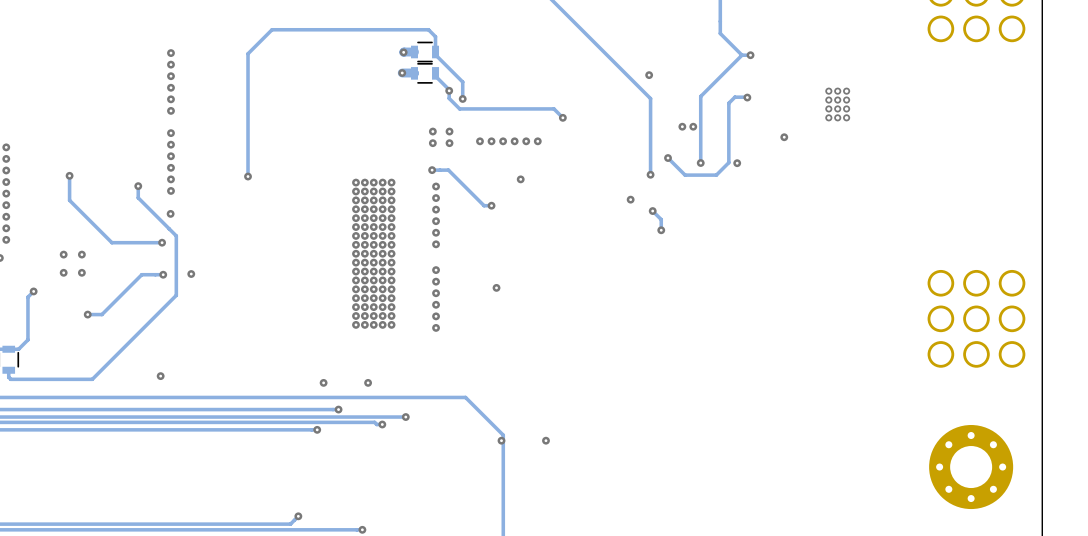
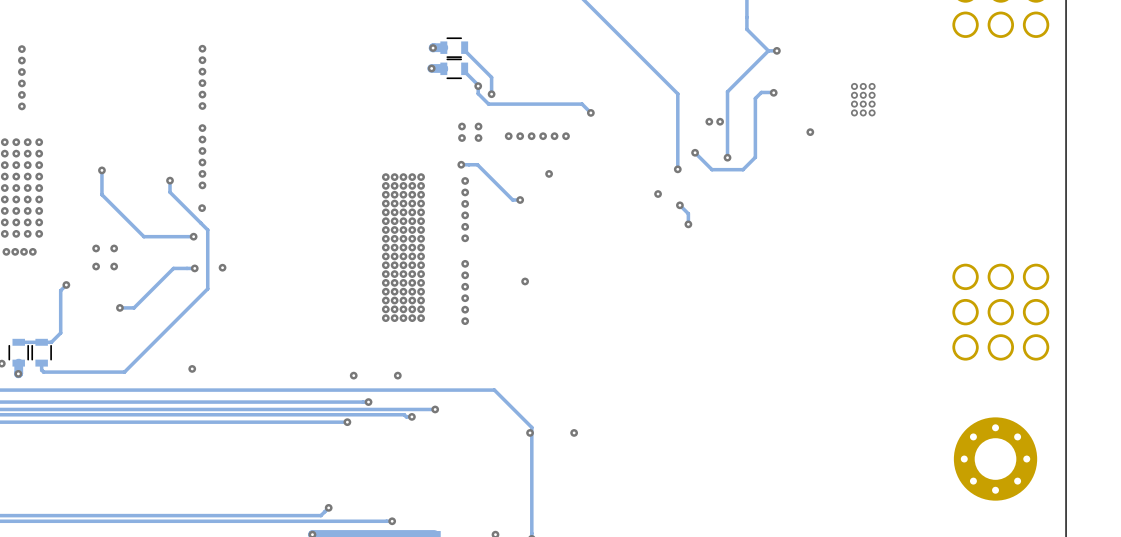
track: (435, 52) (435, 36) (428, 29) (272, 29) (248, 53) (248, 176) -> none
via: (649, 75) -> none
via: (737, 163) -> none
via: (248, 176) -> none

